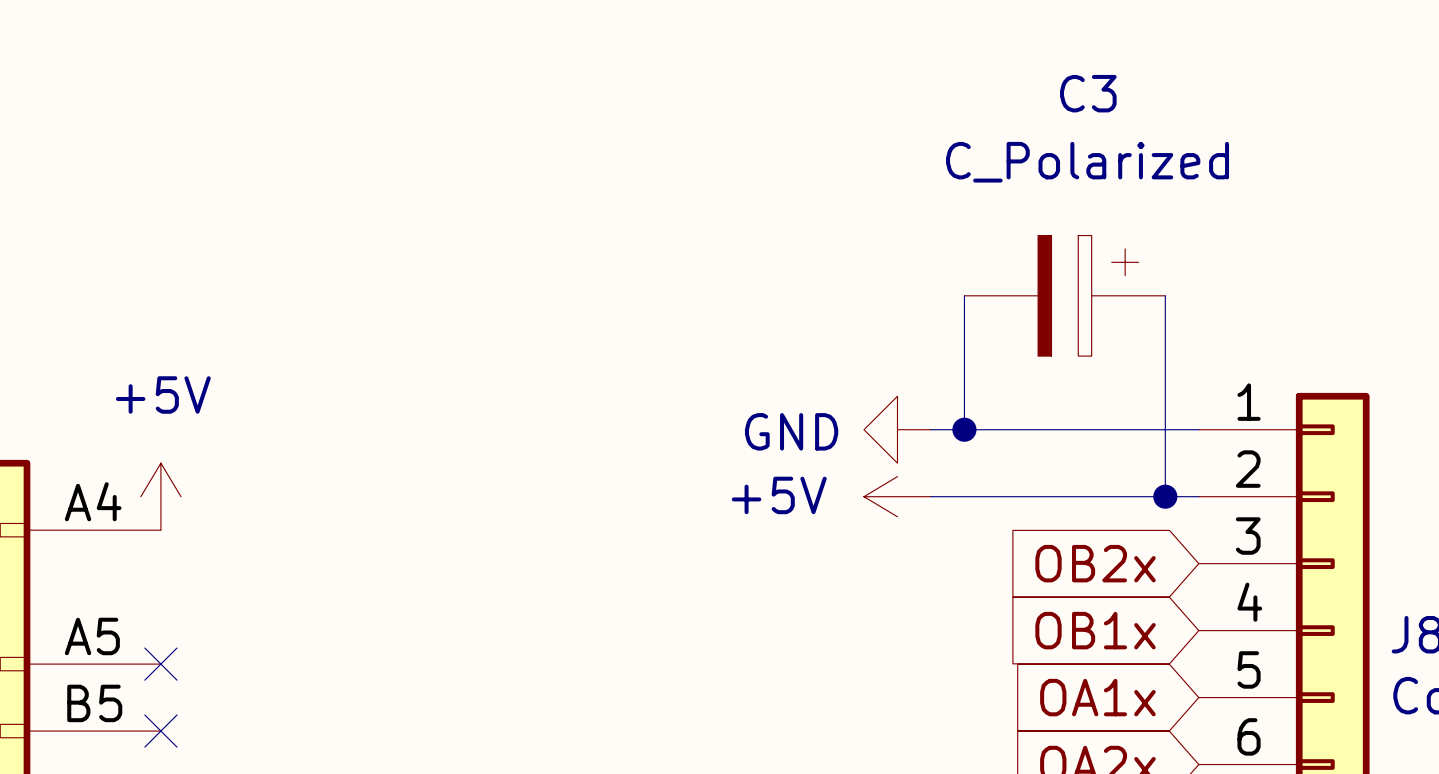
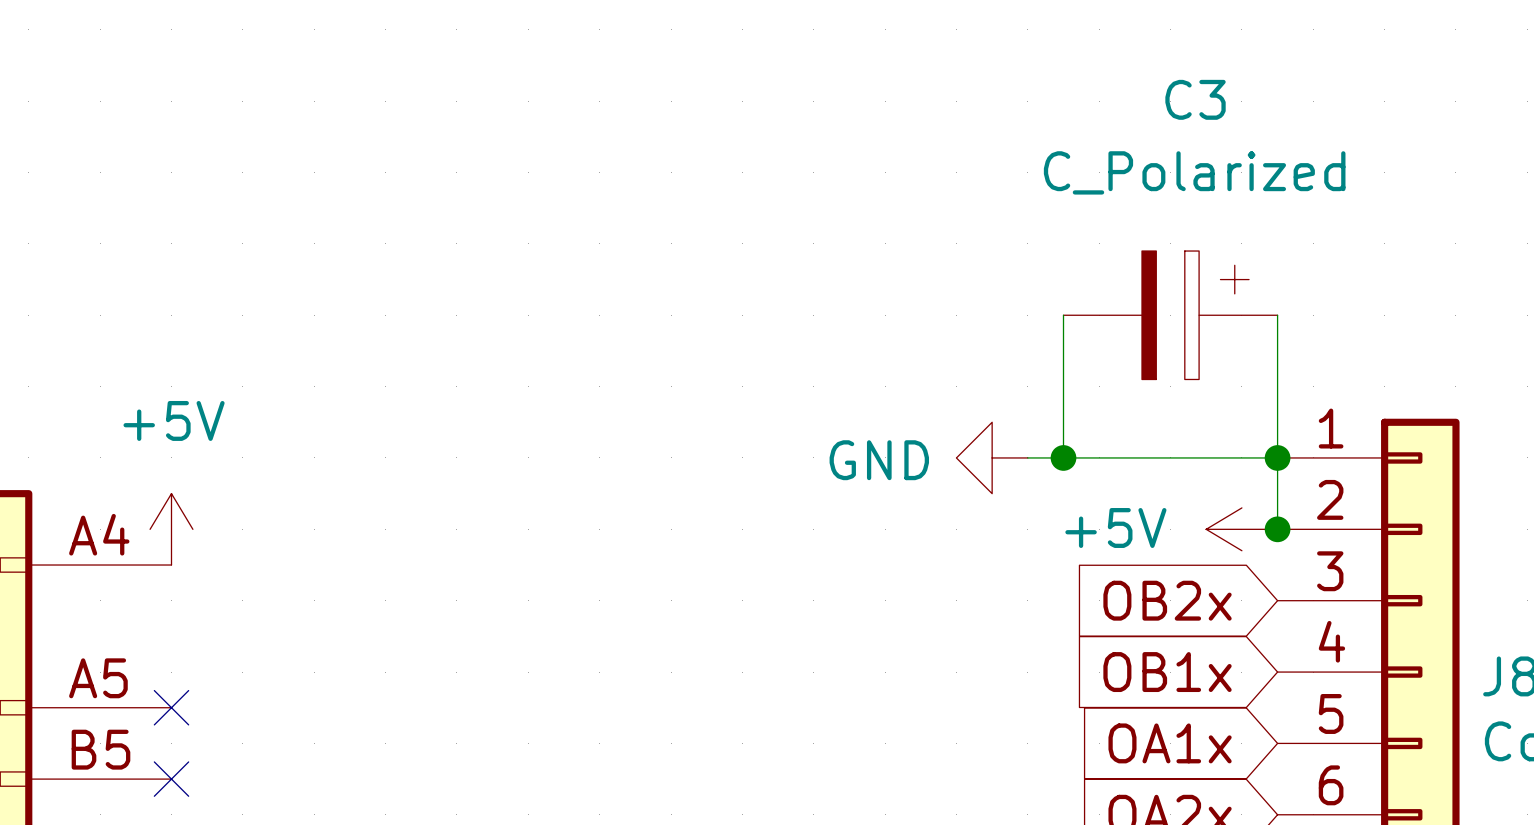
wire: (964, 295) (964, 429) (930, 429) -> none
wire: none -> (1063, 315) (1063, 457)
C3 position: (1064, 295) -> (1170, 315)
wire: (1165, 295) (1165, 496) -> none
power symbol position: GND (897, 429) -> GND (992, 457)
junction position: (964, 429) -> (1063, 457)
junction: none -> (1277, 457)
power symbol position: +5V (897, 496) -> +5V (1241, 529)
wire: (930, 496) (1198, 496) -> (1277, 315) (1277, 529)
junction position: (1165, 496) -> (1277, 529)

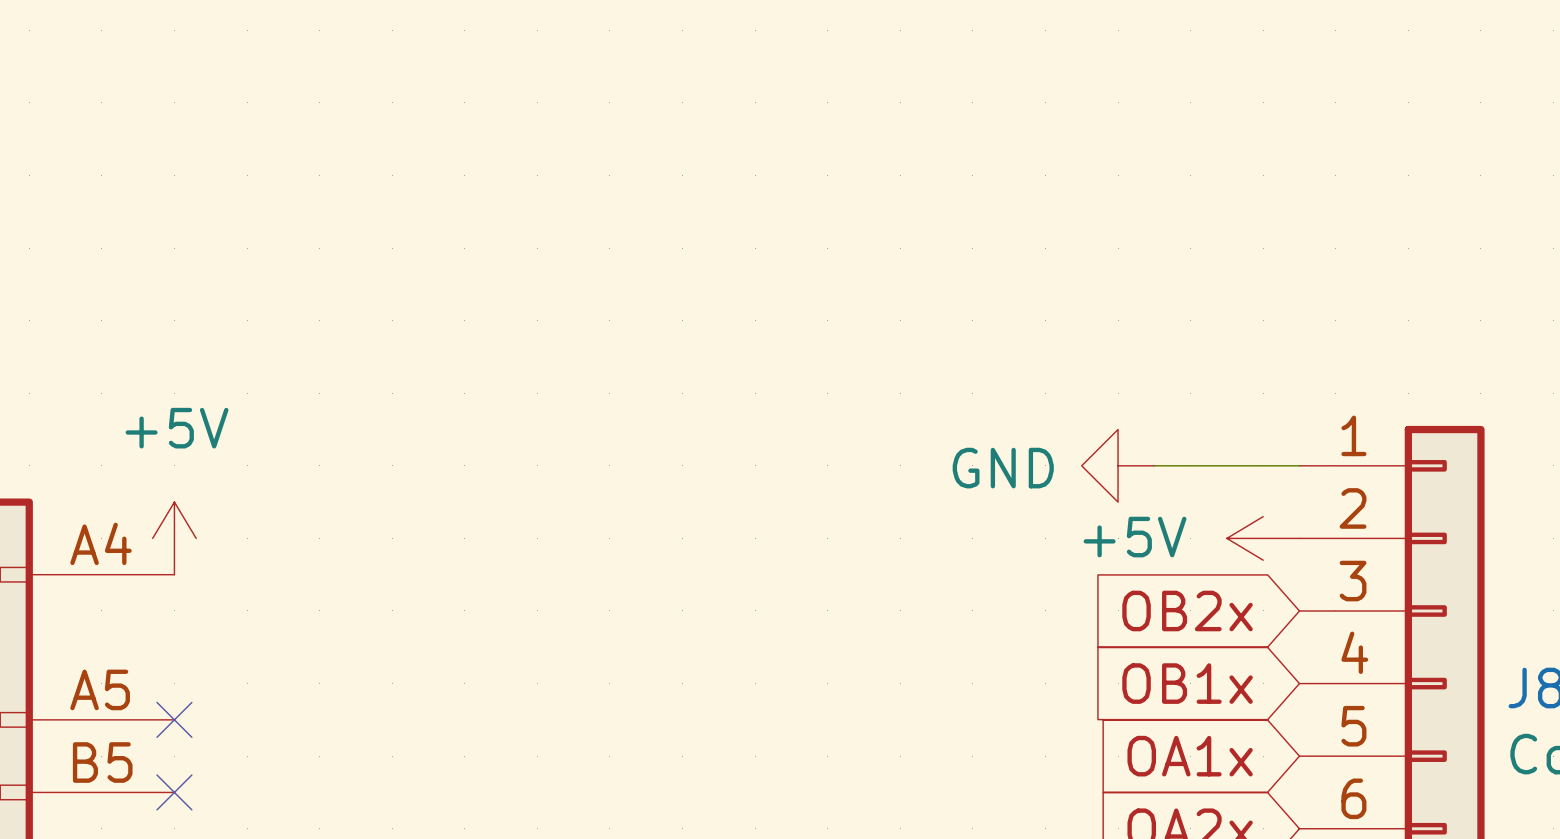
wire: (1063, 315) (1063, 457) -> none
C3: C_Polarized (1170, 315) -> none
wire: (1277, 315) (1277, 529) -> none
power symbol position: GND (992, 457) -> GND (1118, 465)
wire: (1027, 457) (1134, 457) -> none
junction: (1063, 457) -> none
junction: (1277, 457) -> none
junction: (1277, 529) -> none

